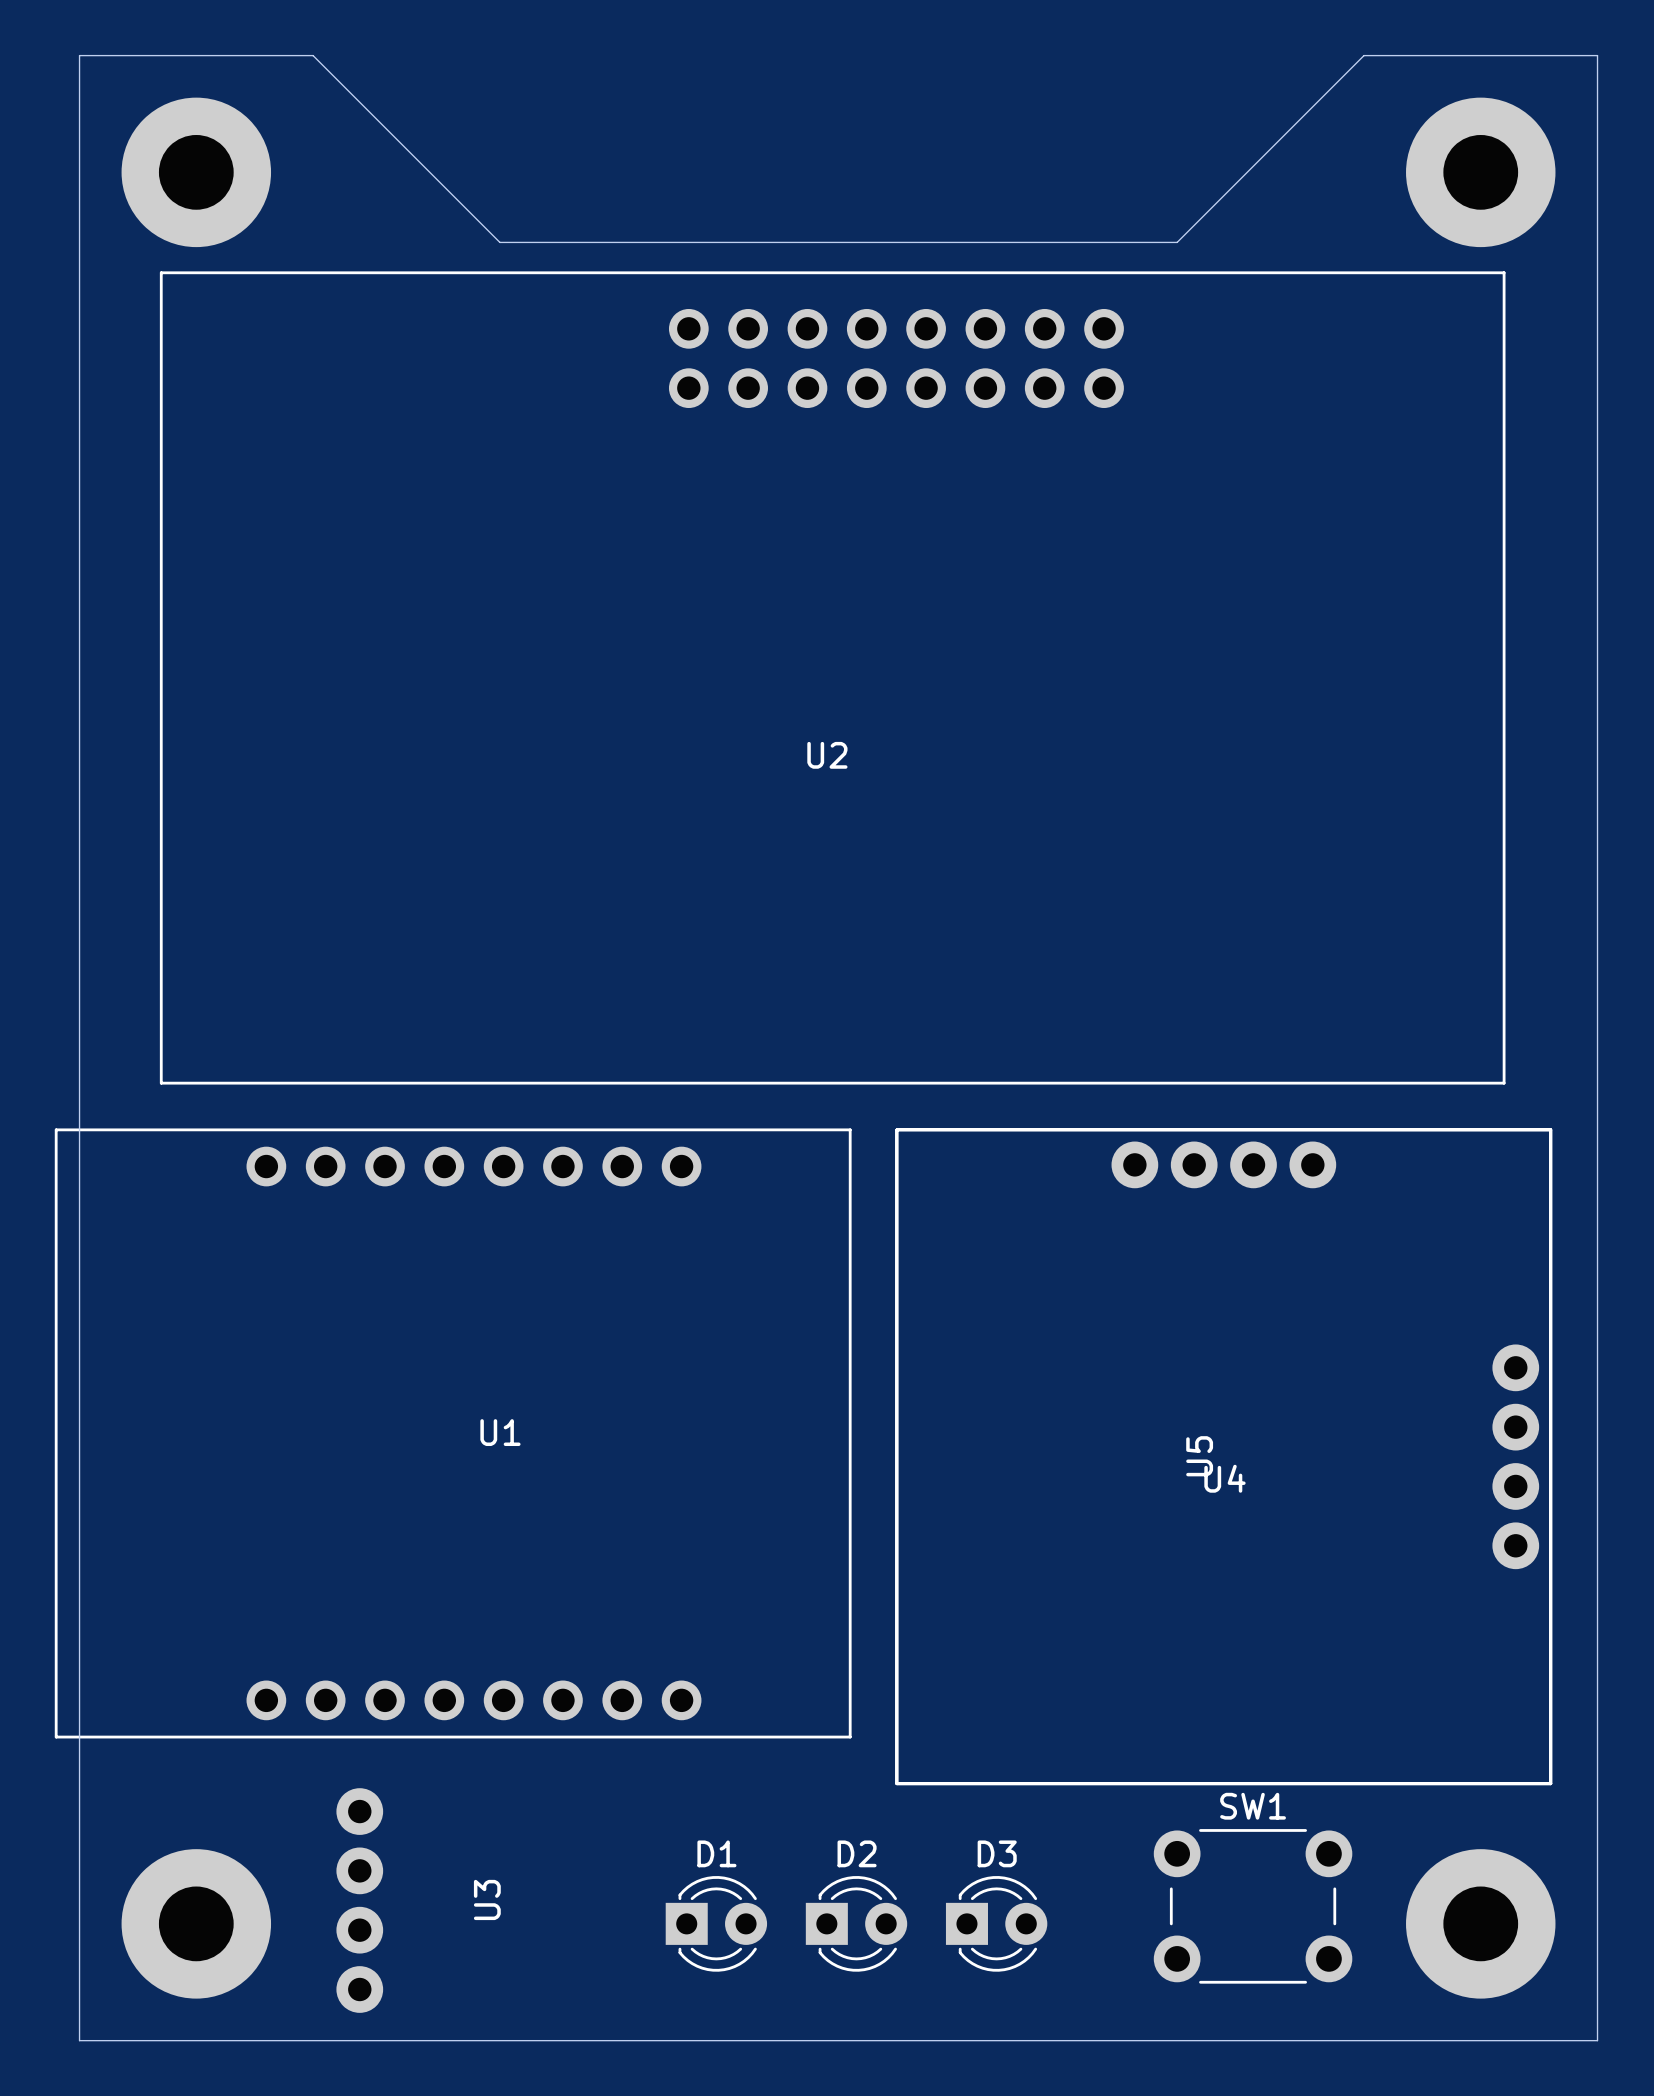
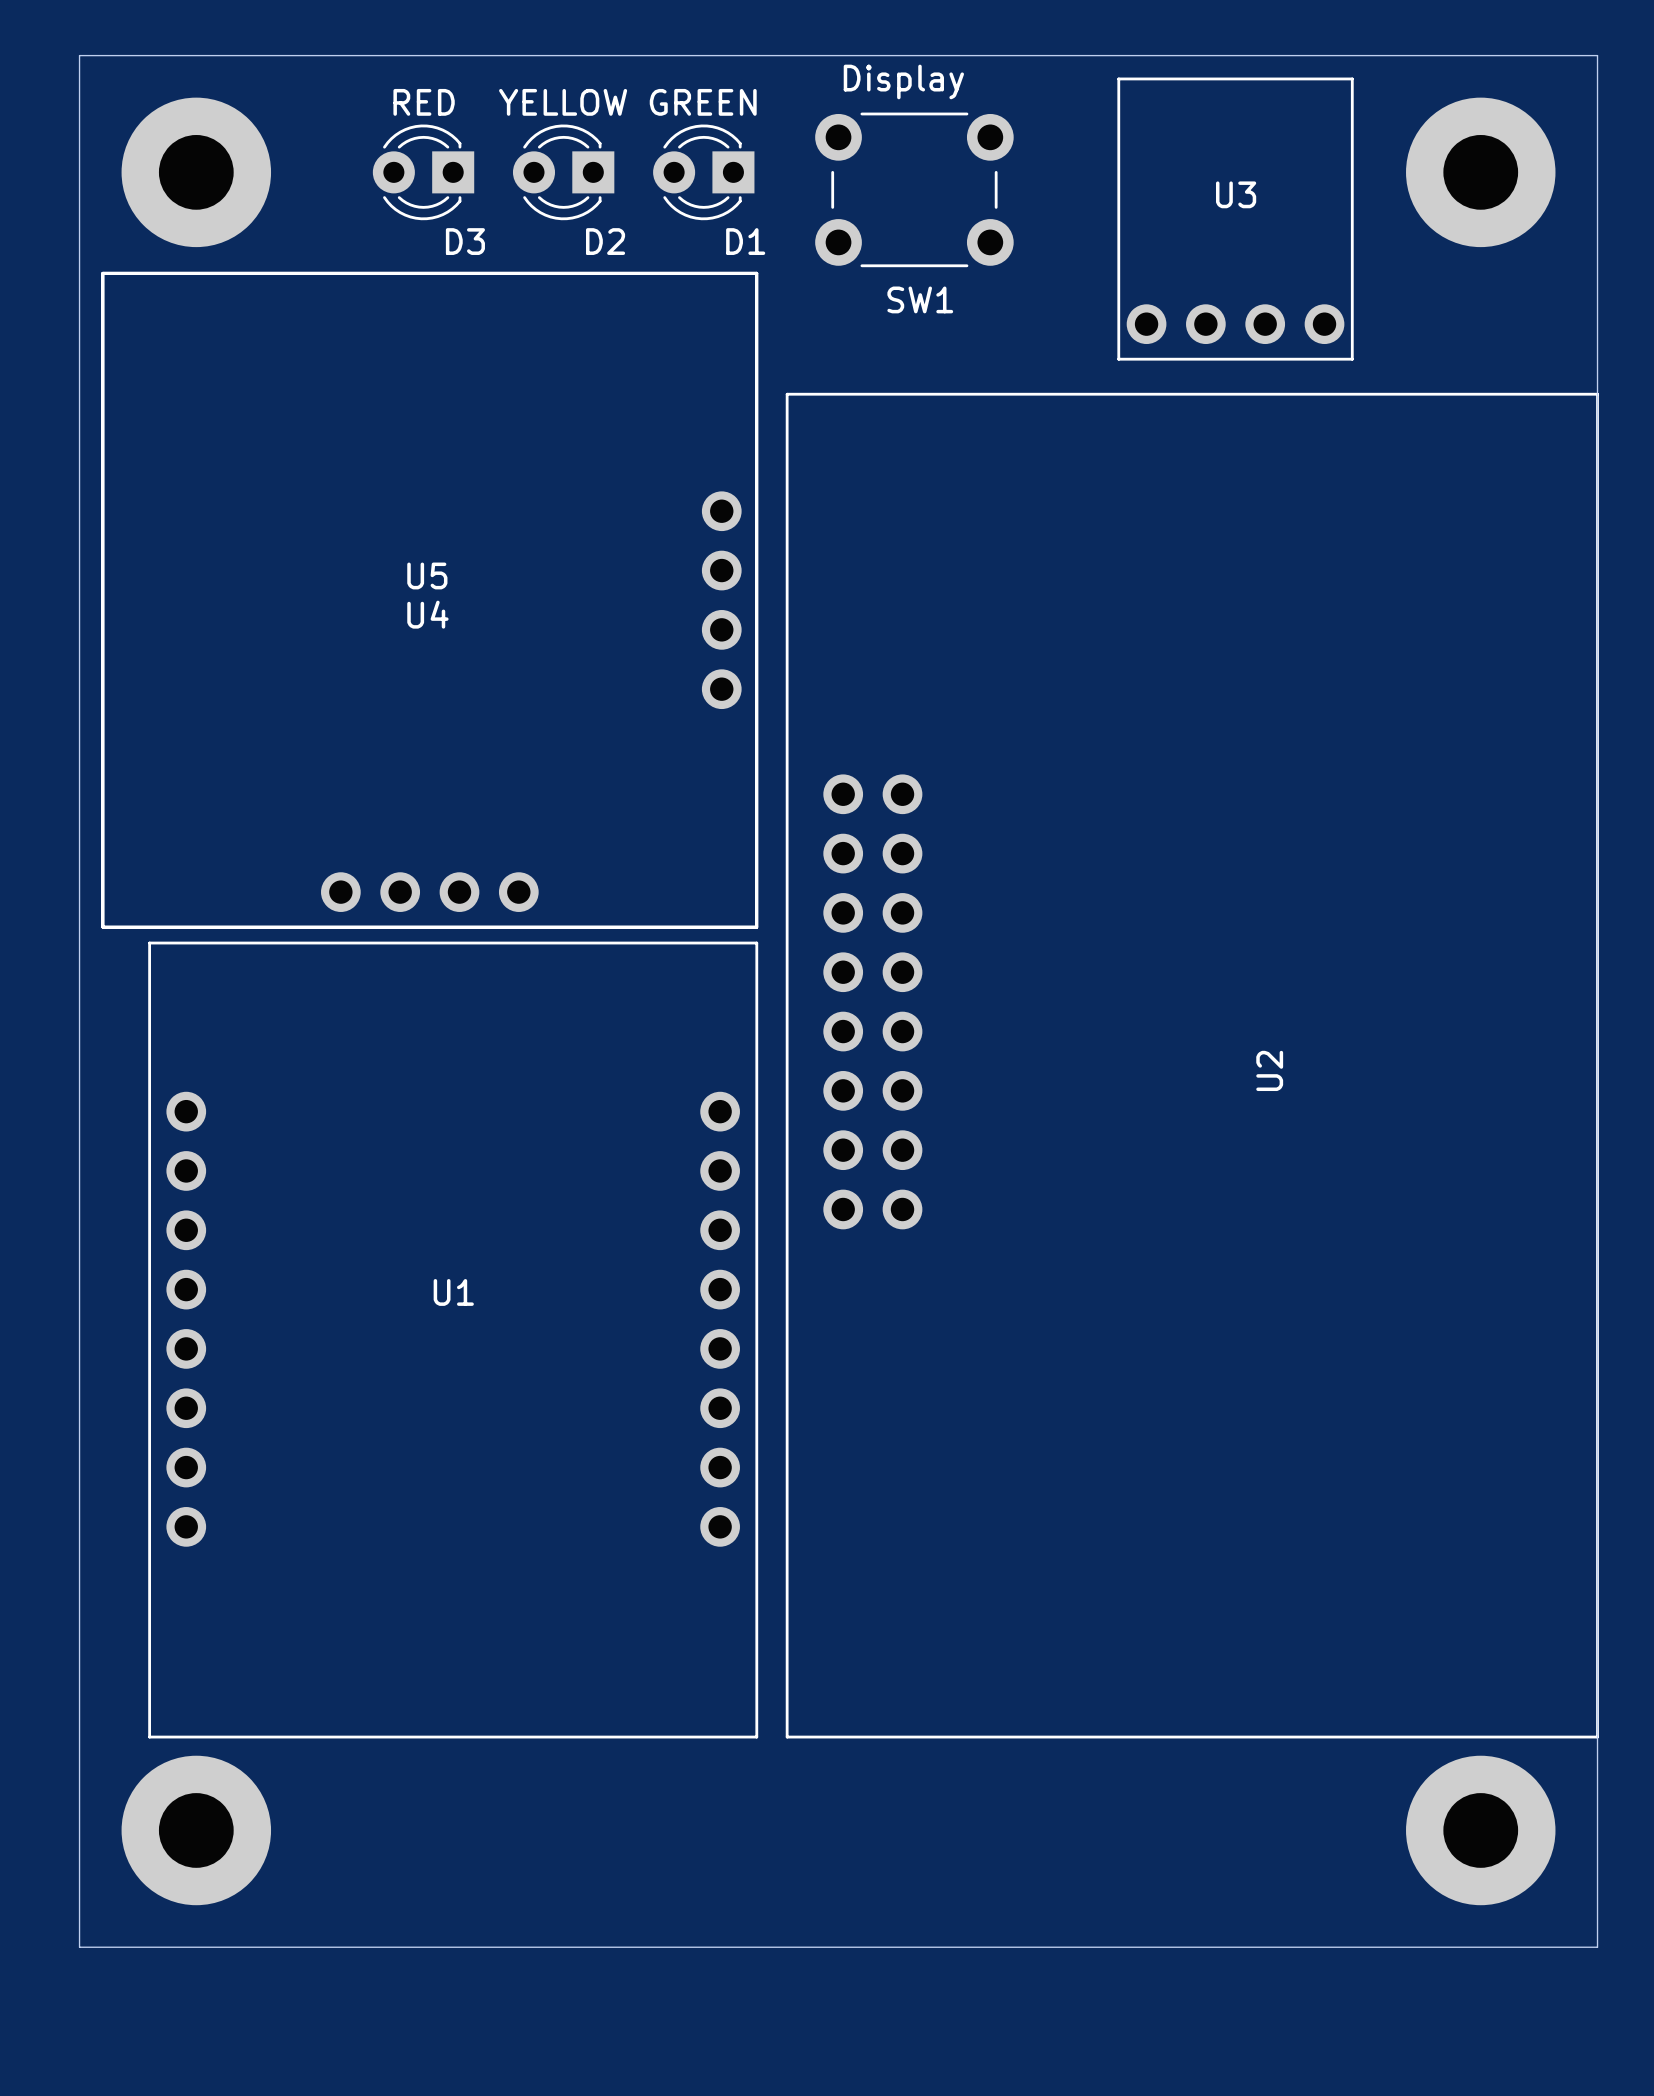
board edge: (313, 55) (499, 242) (1177, 242) (1363, 55) -> (313, 55) (1363, 55)
SW1 value: none -> Display (903, 81)
D3 value: none -> RED (424, 102)
D2 value: none -> YELLOW (563, 102)
D1 value: none -> GREEN (703, 102)
U2 rotation: 0° (832, 677) -> 90° counterclockwise (1192, 1065)
U5 footprint: [895, 1128, 1553, 1786] -> [101, 271, 759, 929]
U4 footprint: [895, 1128, 1553, 1786] -> [101, 271, 759, 929]
U1 rotation: 0° (453, 1433) -> 90° counterclockwise (453, 1340)
U3 footprint: [336, 1788, 384, 2013] -> [1117, 77, 1354, 361]
SW1 name position: SW1 (1253, 1806) -> SW1 (920, 299)
U3 name position: U3 (487, 1899) -> U3 (1236, 194)
SW1 position: (1253, 1906) -> (914, 189)
part position: (196, 1923) -> (196, 1830)
D1 rotation: 0° (716, 1923) -> 180° (703, 172)
D1 position: (716, 1923) -> (703, 172)
D2 rotation: 0° (856, 1923) -> 180° (563, 172)
D2 position: (856, 1923) -> (563, 172)
D3 rotation: 0° (996, 1923) -> 180° (423, 172)
D3 position: (996, 1923) -> (423, 172)
part position: (1480, 1923) -> (1480, 1830)
board edge: (79, 1947) (79, 2040) (1597, 2040) (1597, 1947) -> (79, 1947) (1597, 1947)

